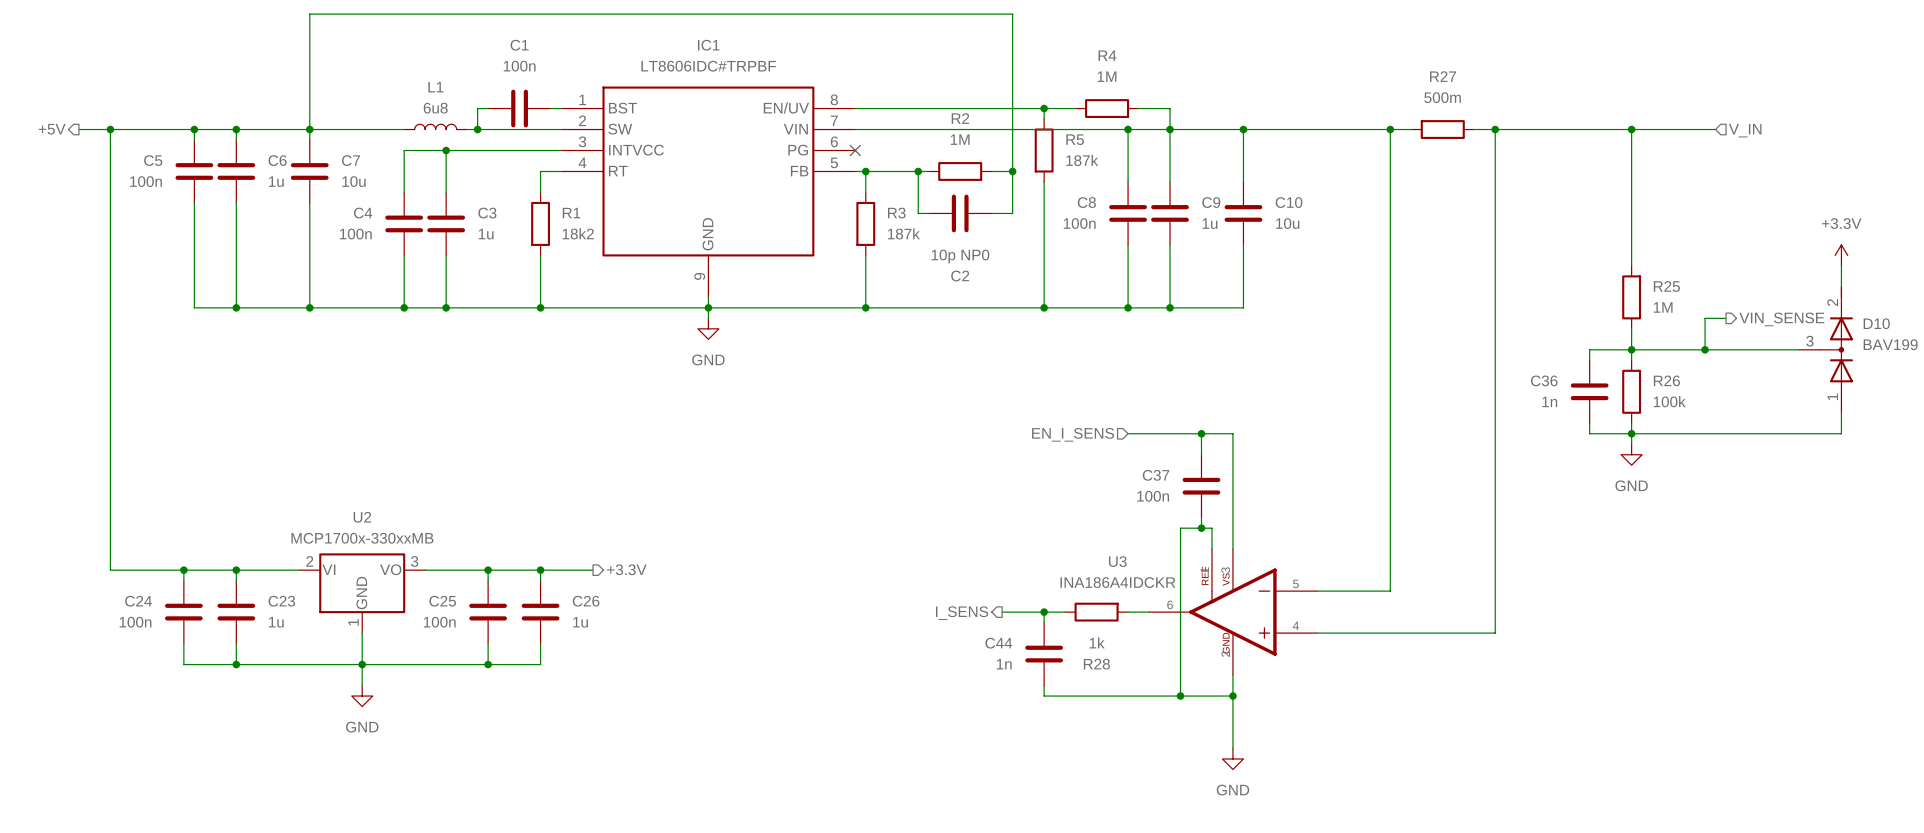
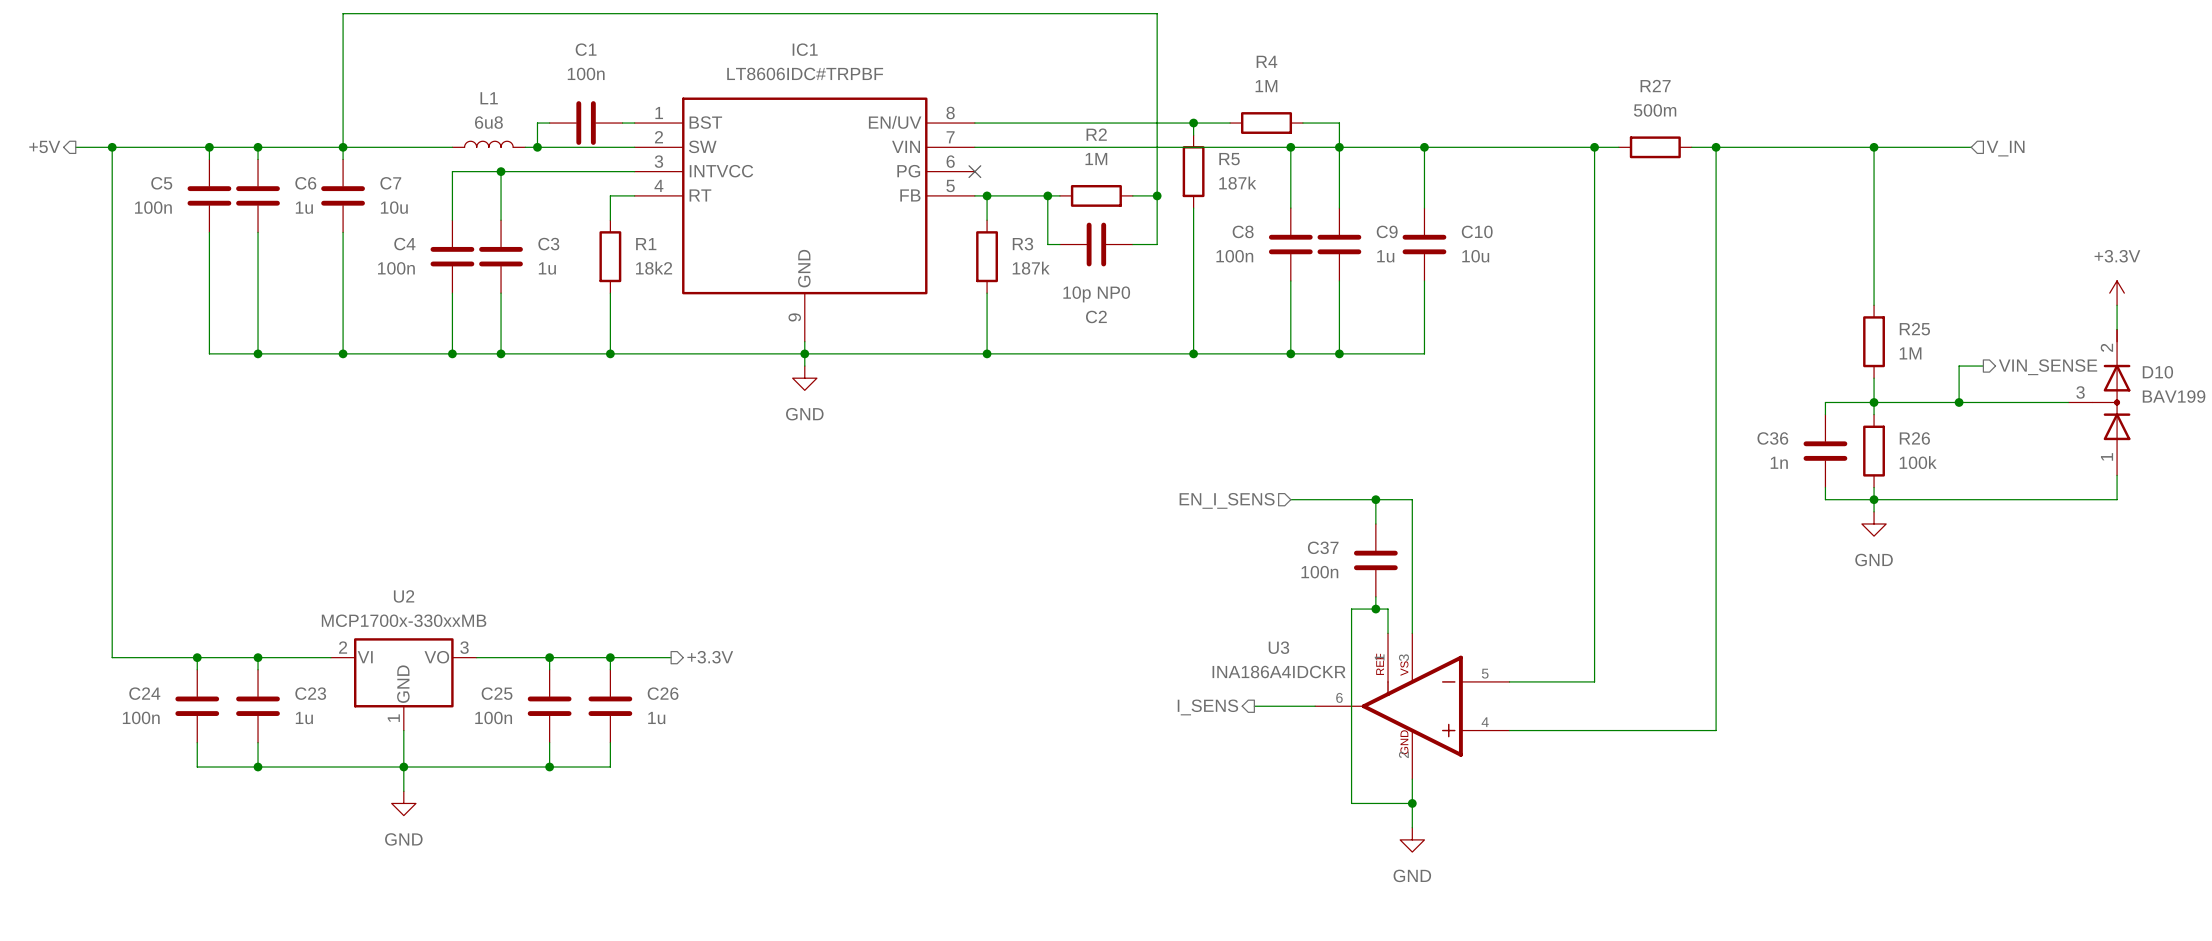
wire: (1002, 612) (1065, 612) -> none
wire: (1044, 612) (1044, 622) -> none
junction: (1044, 612) -> none
wire: none -> (1254, 706) (1290, 706)
R28: 1k (1096, 612) -> none
hierarchical label position: I_SENS (962, 613) -> I_SENS (1207, 707)
C44: 1n (1044, 654) -> none
wire: (1044, 685) (1044, 696) (1180, 696) -> none
junction: (1180, 696) -> none
wire: (1232, 717) (1232, 748) -> none
power symbol position: GND (1232, 758) -> GND (1412, 839)

